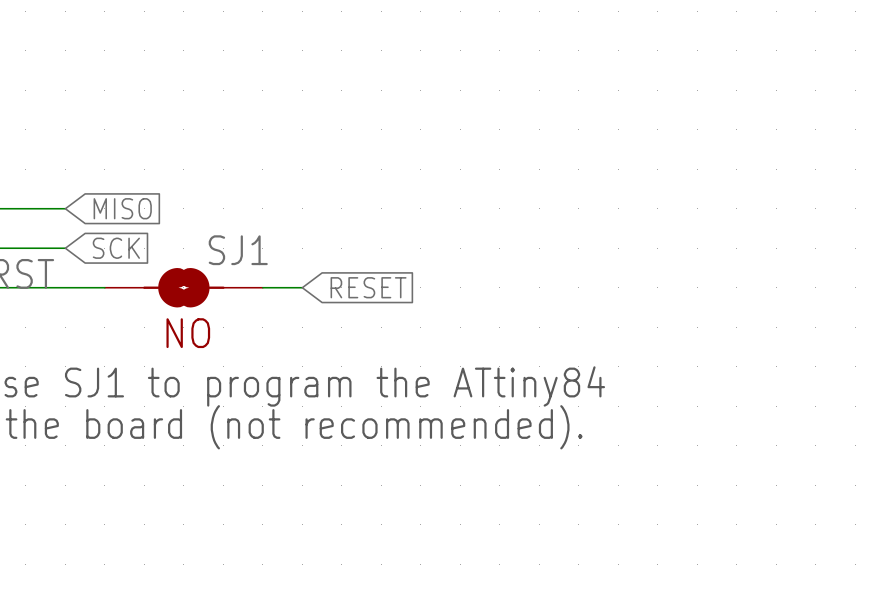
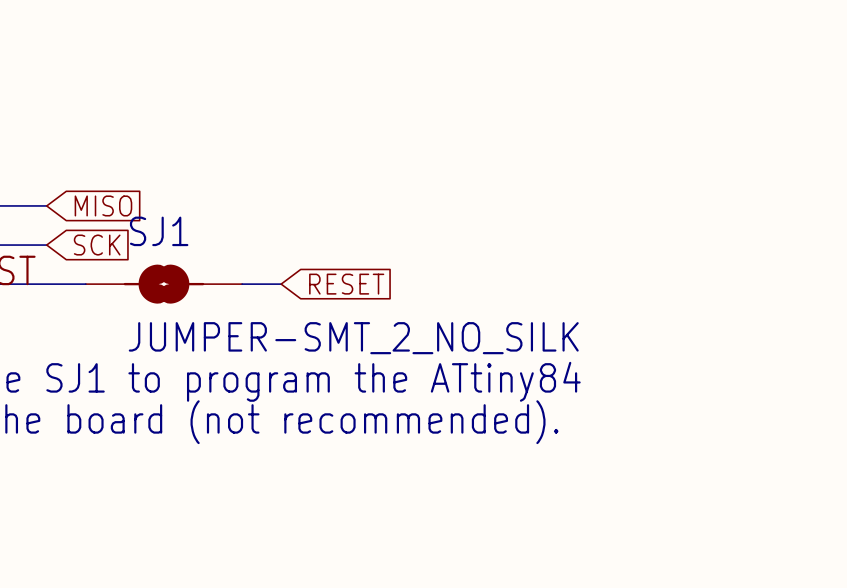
SJ1 name position: SJ1 (238, 250) -> SJ1 (159, 231)
text: NO (188, 333) -> none
SJ1 value: none -> JUMPER-SMT_2_NO_SILK (353, 338)

